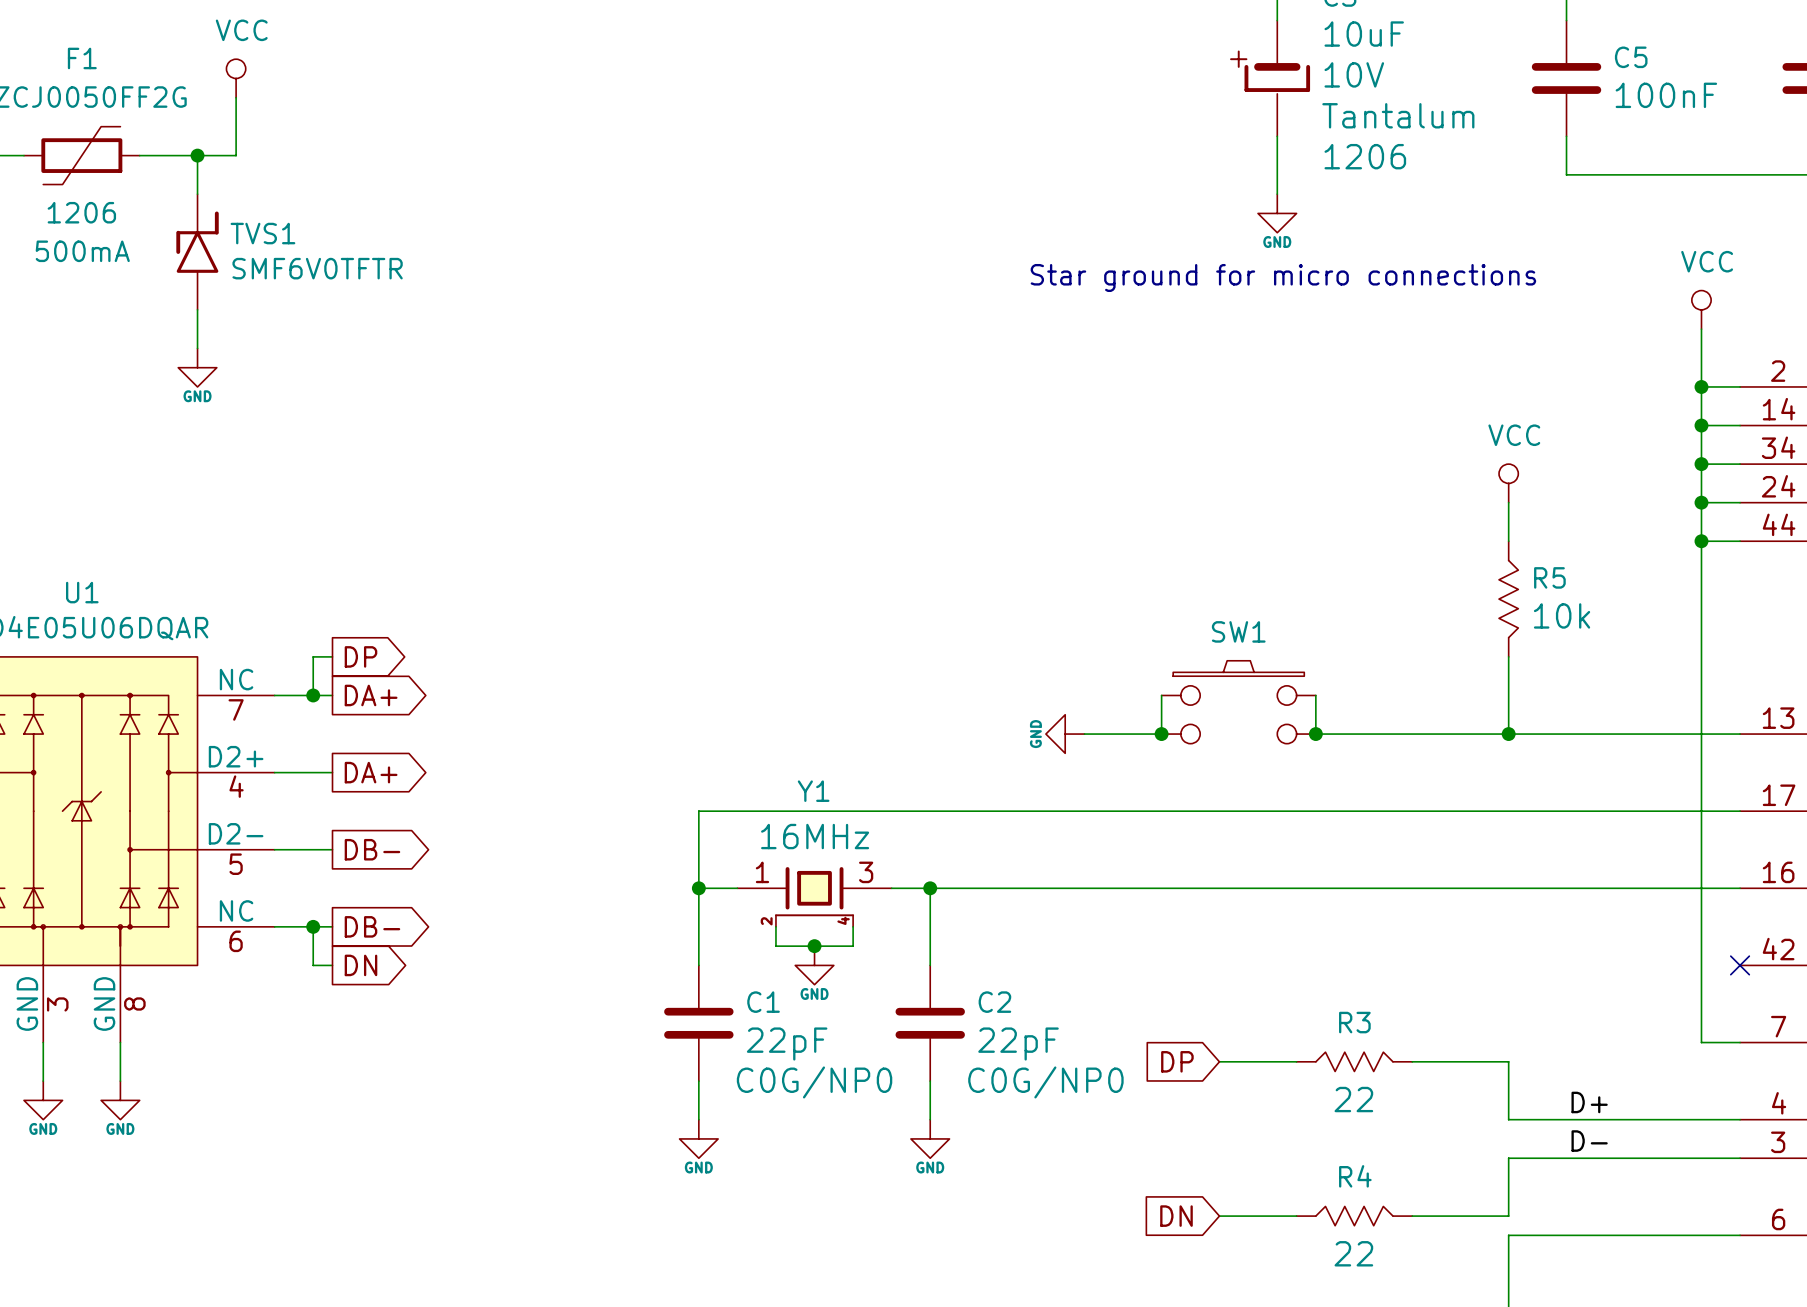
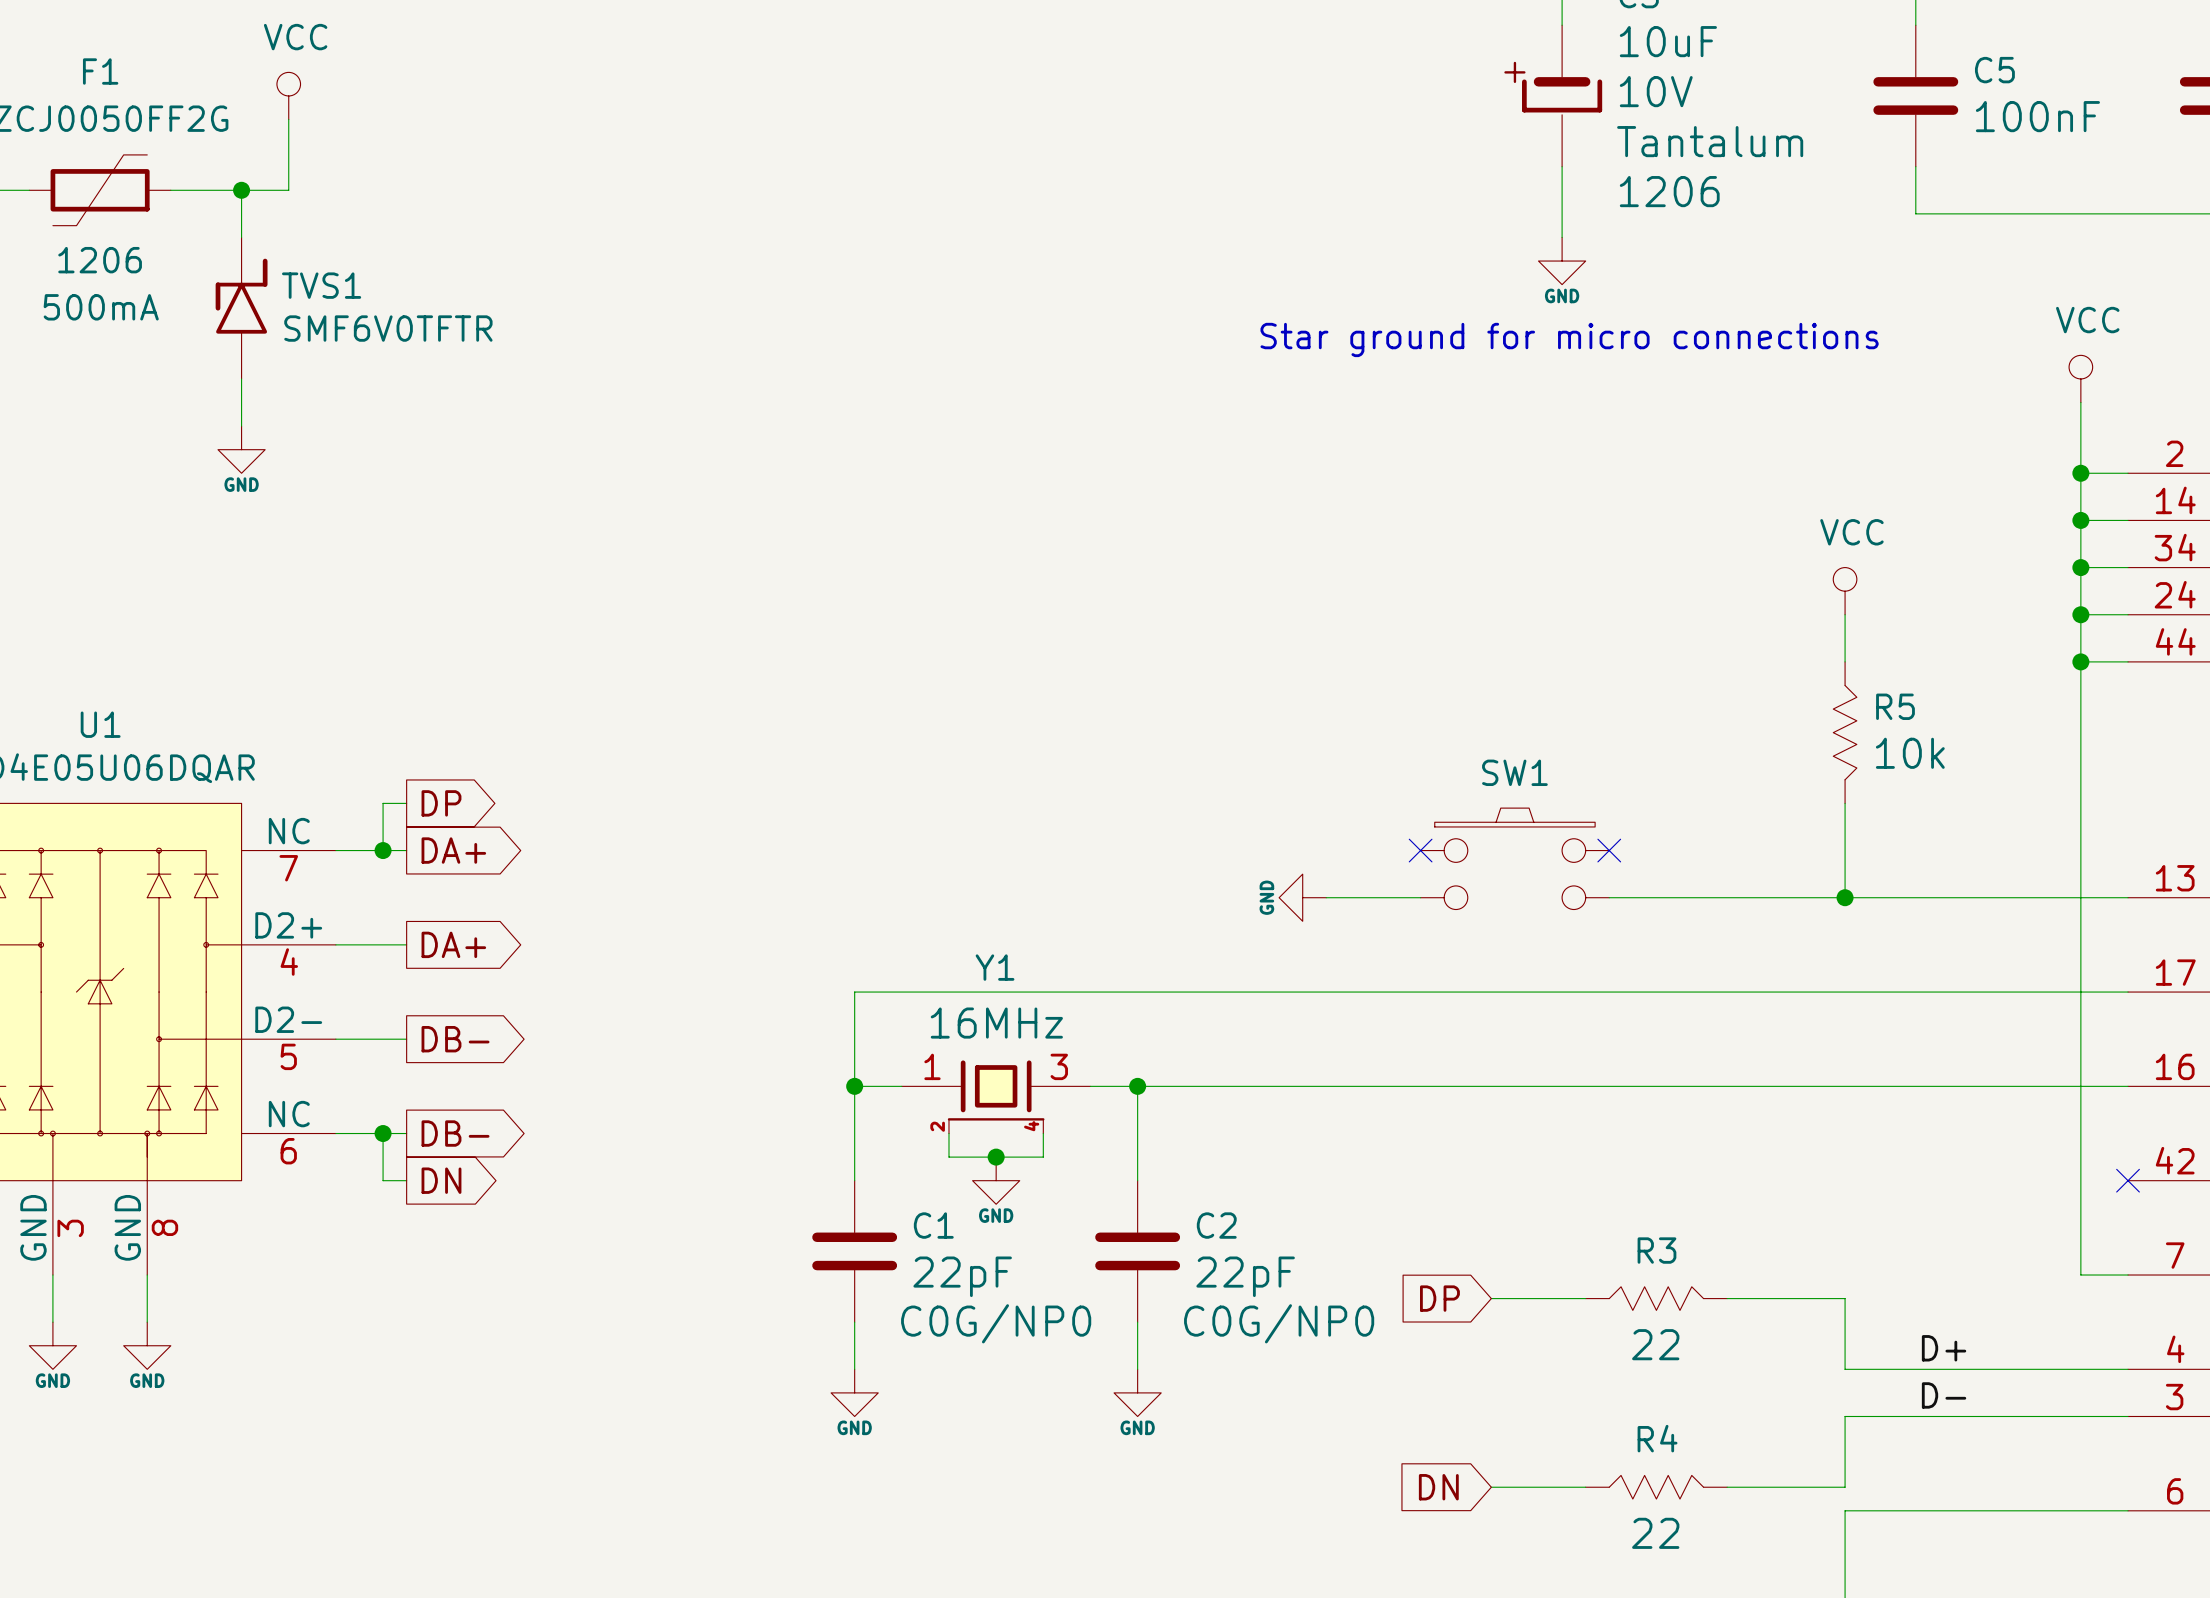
wire: (1161, 695) (1161, 734) -> none
no-connect mark: none -> (1420, 850)
wire: (1315, 695) (1315, 734) -> none
no-connect mark: none -> (1609, 850)
junction: (1161, 734) -> none
junction: (1315, 734) -> none

